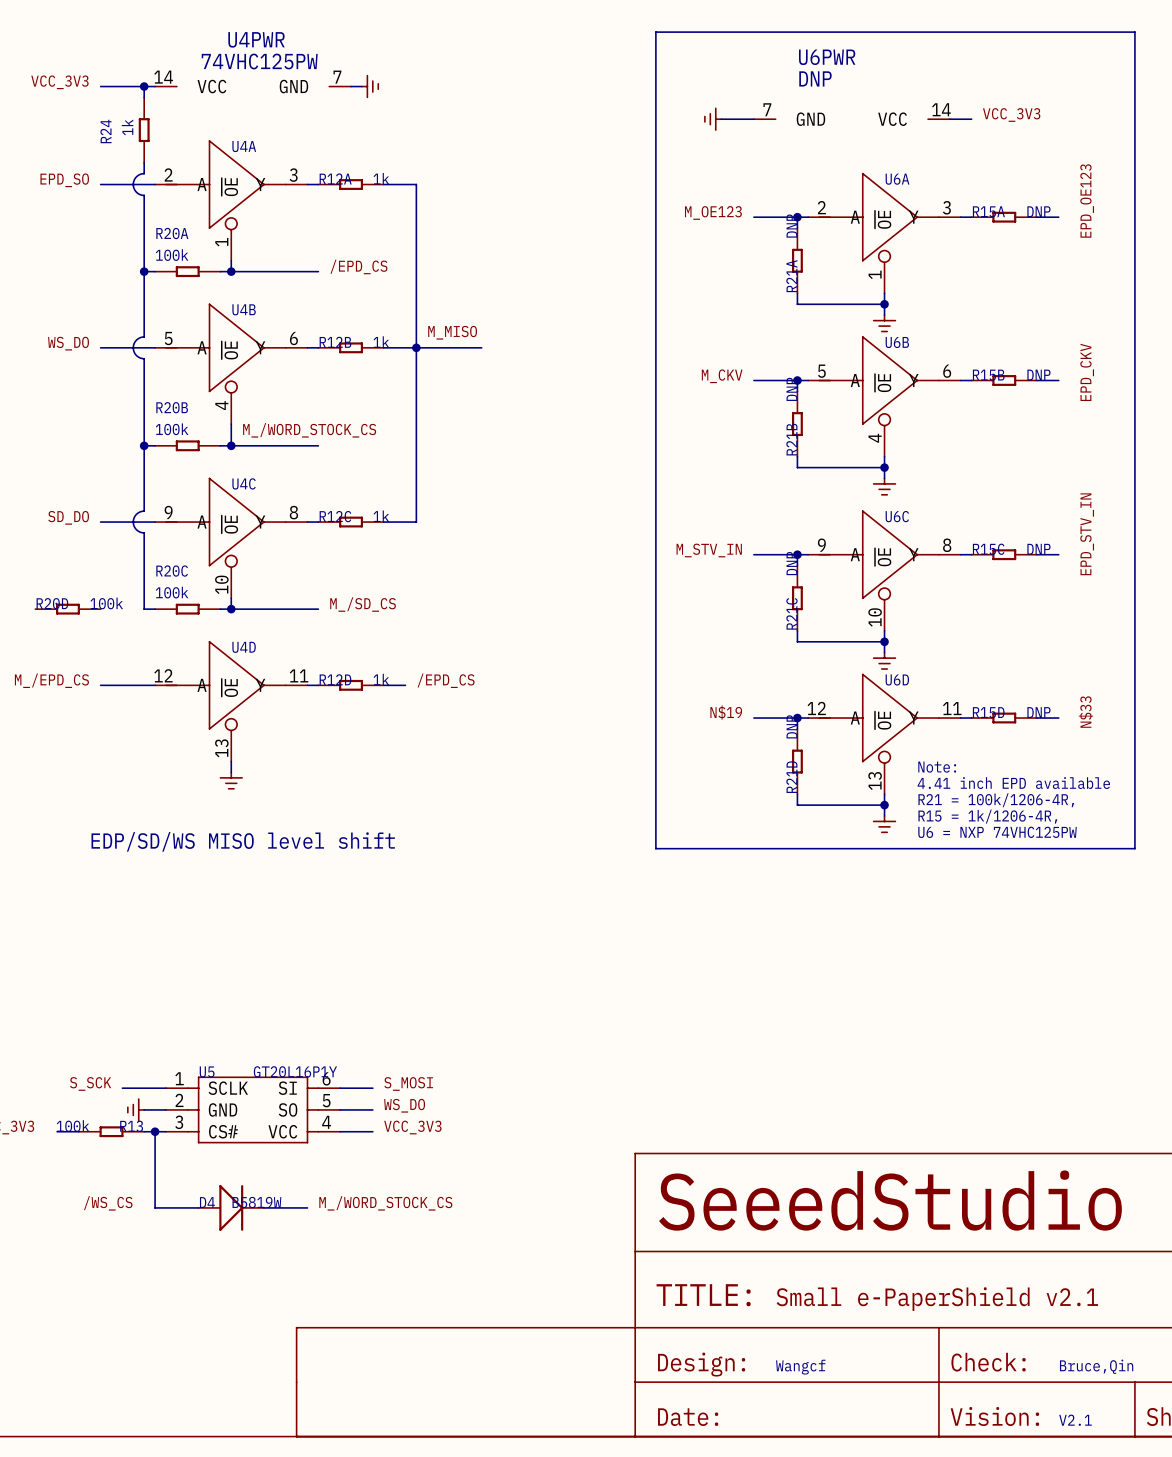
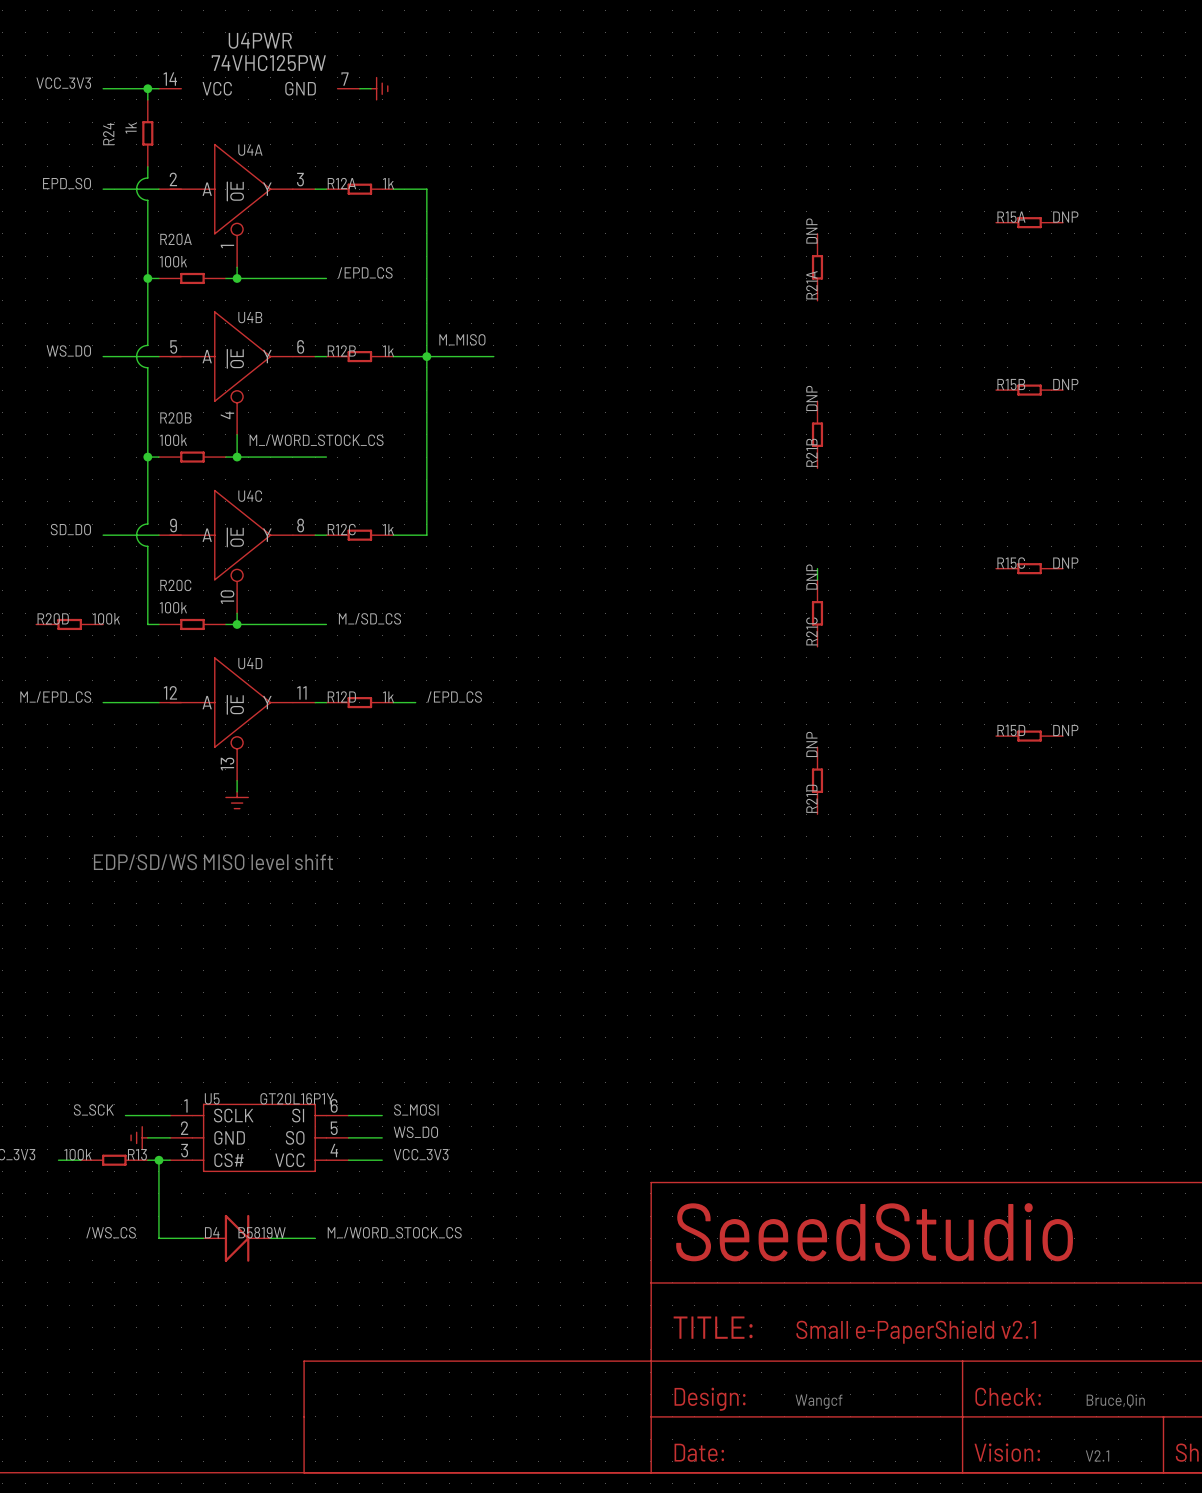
line: (655, 32) (1134, 32) (1134, 848) (655, 848) (655, 32) -> none
label: VCC_3V3 (1011, 114) -> none
power symbol: (713, 119) -> none
wire: (721, 119) (753, 119) -> none
U6PWR: DNP (851, 119) -> none
wire: (949, 119) (971, 119) -> none
label: EPD_OE123 (1087, 201) -> none
label: M_OE123 (713, 212) -> none
wire: (753, 217) (808, 217) -> none
wire: (797, 217) (797, 228) -> none
junction: (797, 217) -> none
wire: (960, 217) (971, 217) -> none
wire: (1036, 217) (1058, 217) -> none
U6A: (884, 233) -> none
wire: (797, 293) (797, 304) (884, 304) -> none
wire: (884, 293) (884, 315) -> none
junction: (884, 304) -> none
power symbol: (884, 323) -> none
label: EPD_CKV (1087, 372) -> none
label: M_CKV (722, 376) -> none
wire: (753, 380) (808, 380) -> none
wire: (797, 380) (797, 391) -> none
junction: (797, 380) -> none
wire: (960, 380) (971, 380) -> none
wire: (1036, 380) (1058, 380) -> none
U6B: (884, 396) -> none
wire: (797, 456) (797, 467) (884, 467) -> none
wire: (884, 456) (884, 478) -> none
junction: (884, 467) -> none
power symbol: (884, 486) -> none
label: EPD_STV_IN (1087, 534) -> none
label: M_STV_IN (709, 550) -> none
wire: (753, 554) (808, 554) -> none
junction: (797, 554) -> none
wire: (960, 554) (971, 554) -> none
wire: (1036, 554) (1058, 554) -> none
U6C: (884, 570) -> none
wire: (797, 630) (797, 641) (884, 641) -> none
wire: (884, 630) (884, 652) -> none
junction: (884, 641) -> none
power symbol: (884, 660) -> none
label: N$19 (726, 712) -> none
label: N$33 (1085, 712) -> none
wire: (753, 718) (808, 718) -> none
wire: (797, 718) (797, 728) -> none
junction: (797, 718) -> none
wire: (960, 718) (971, 718) -> none
wire: (1036, 718) (1058, 718) -> none
U6D: (884, 734) -> none
text: Note: (937, 767) -> none
text: 4.41 inch EPD available (1013, 783) -> none
wire: (797, 794) (797, 805) (884, 805) -> none
wire: (884, 794) (884, 816) -> none
text: R21 = 100k/1206-4R, (996, 800) -> none
junction: (884, 805) -> none
text: R15 = 1k/1206-4R, (987, 816) -> none
power symbol: (884, 824) -> none
text: U6 = NXP 74VHC125PW (997, 832) -> none

